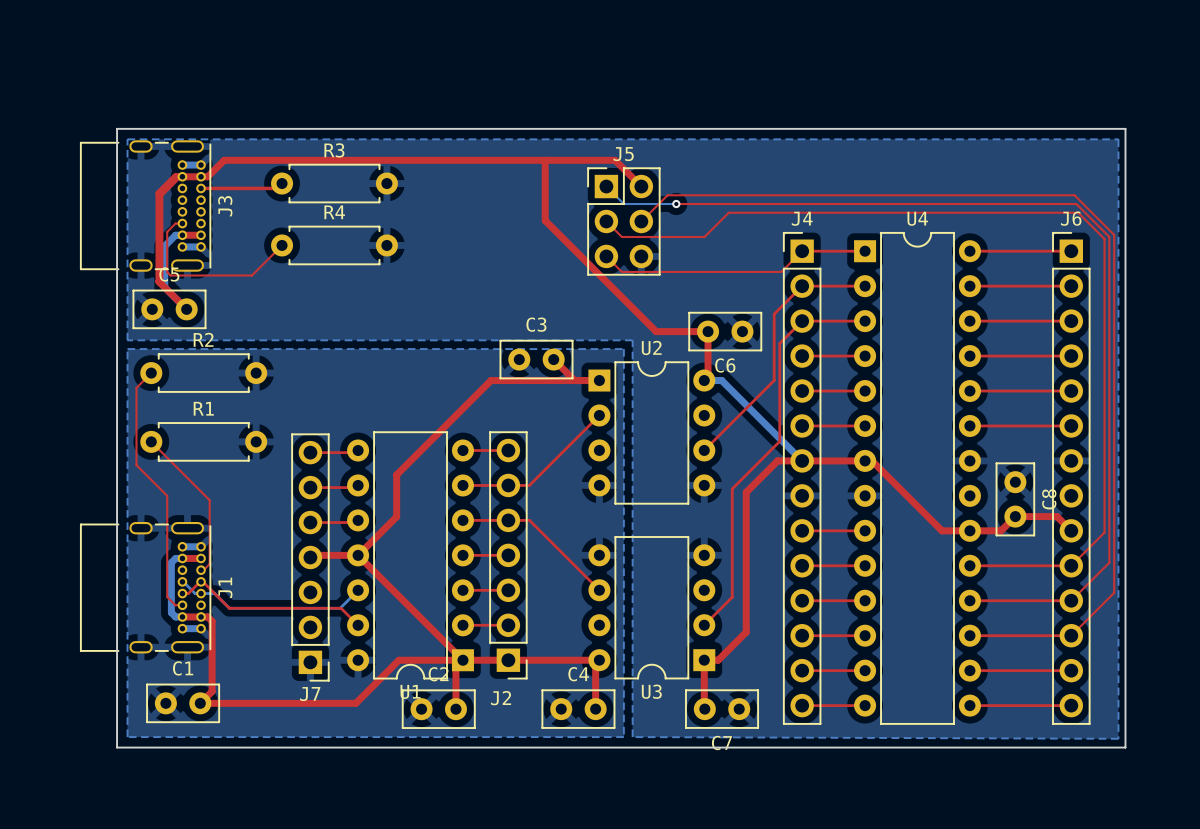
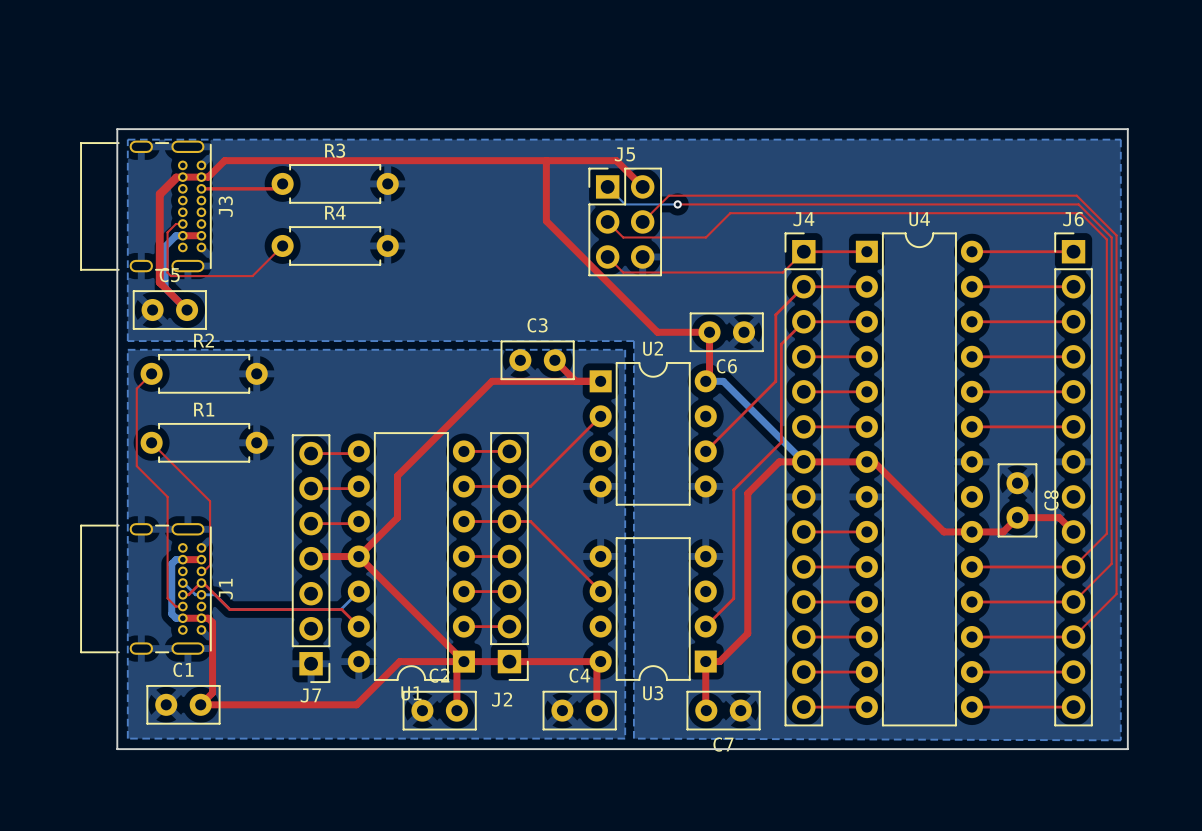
bottom track: (182, 165) (201, 165) -> none
bottom track: (182, 246) (201, 246) -> none
bottom track: (182, 546) (201, 546) -> none
bottom track: (182, 628) (201, 628) -> none

